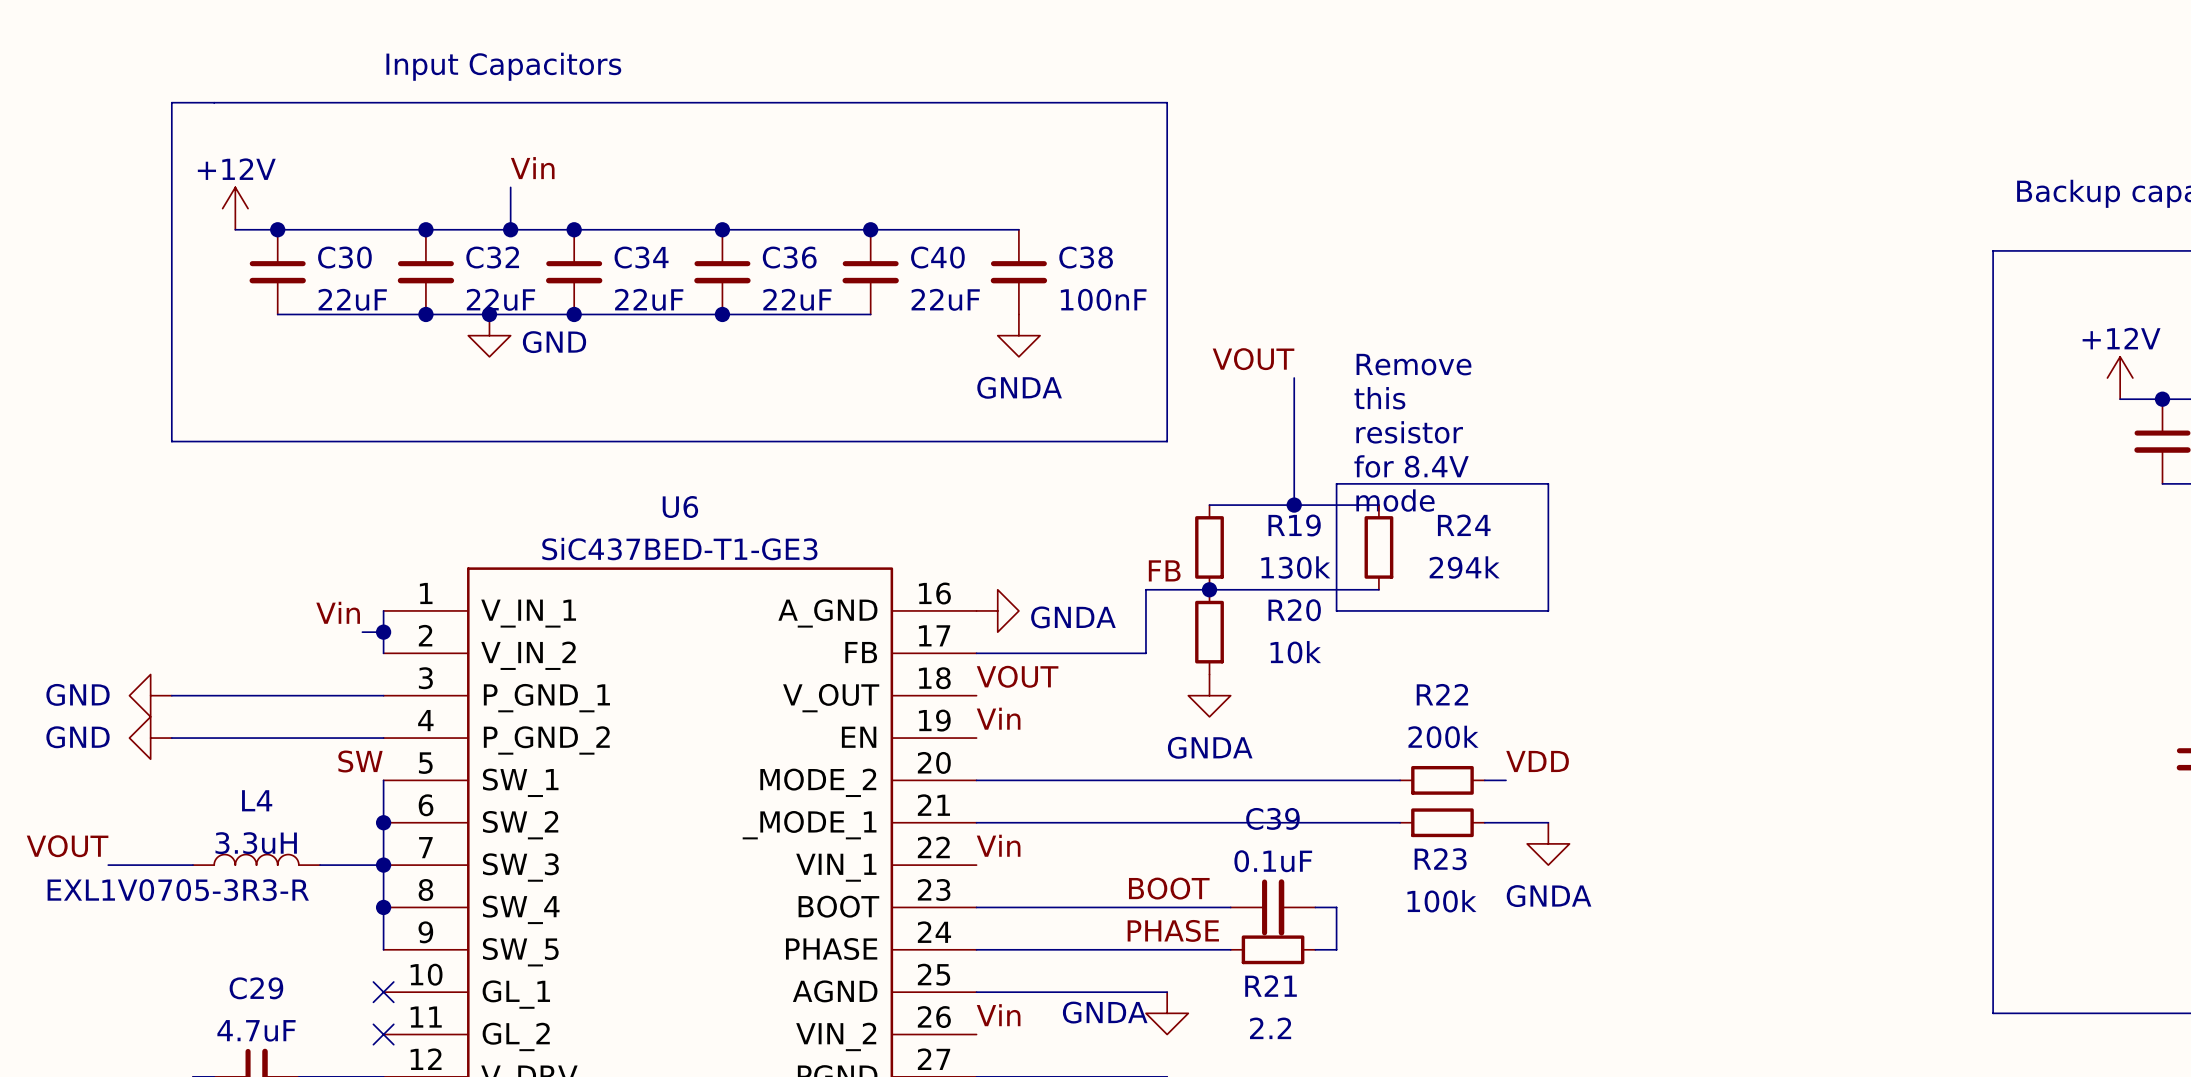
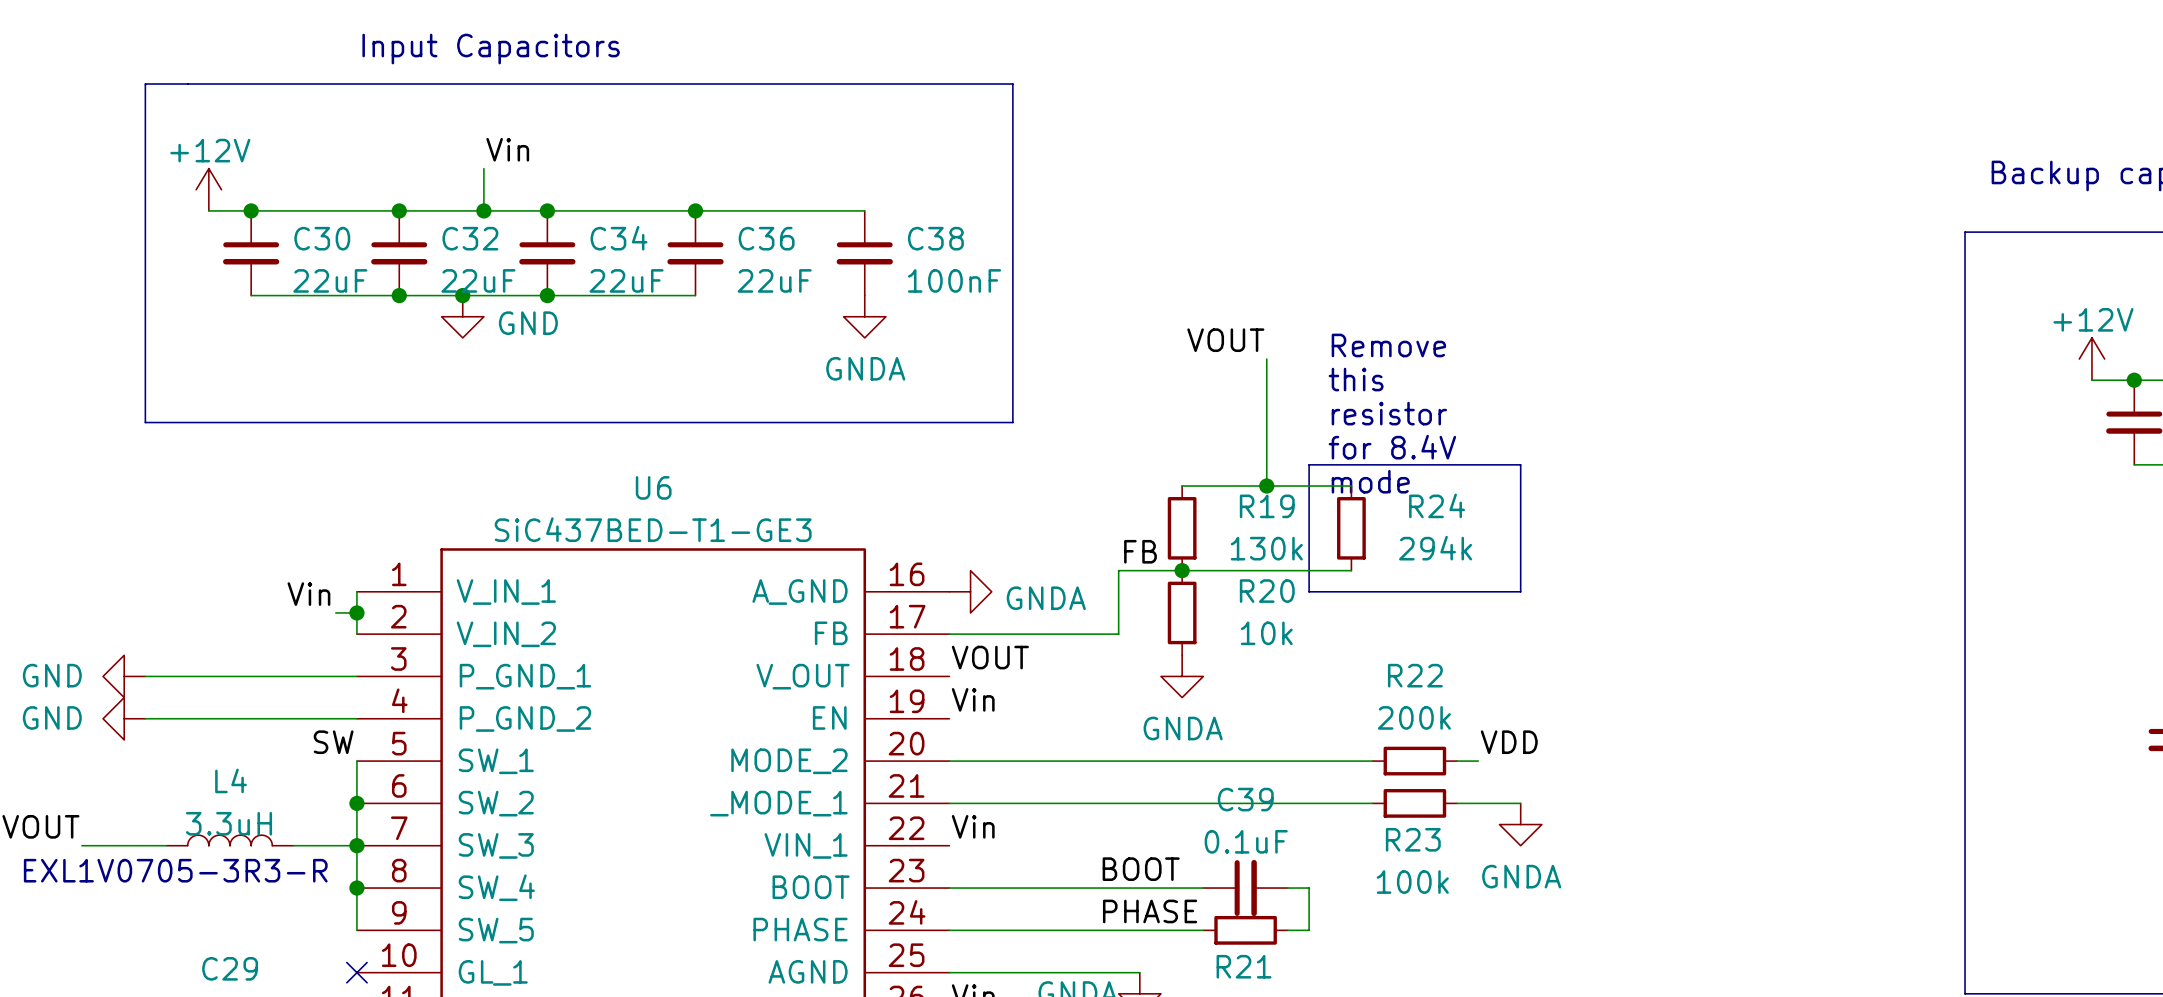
line: (1040, 102) (1167, 102) (1167, 441) (1040, 441) -> (1012, 84) (1012, 422)
junction: (870, 229) -> none
wire: (891, 229) (1018, 229) -> none
C40: 22uF (870, 272) -> none
C38 position: (1018, 272) -> (864, 253)
wire: (722, 314) (870, 314) -> none
junction: (722, 314) -> none
power symbol position: GNDA (1018, 335) -> GNDA (864, 316)

